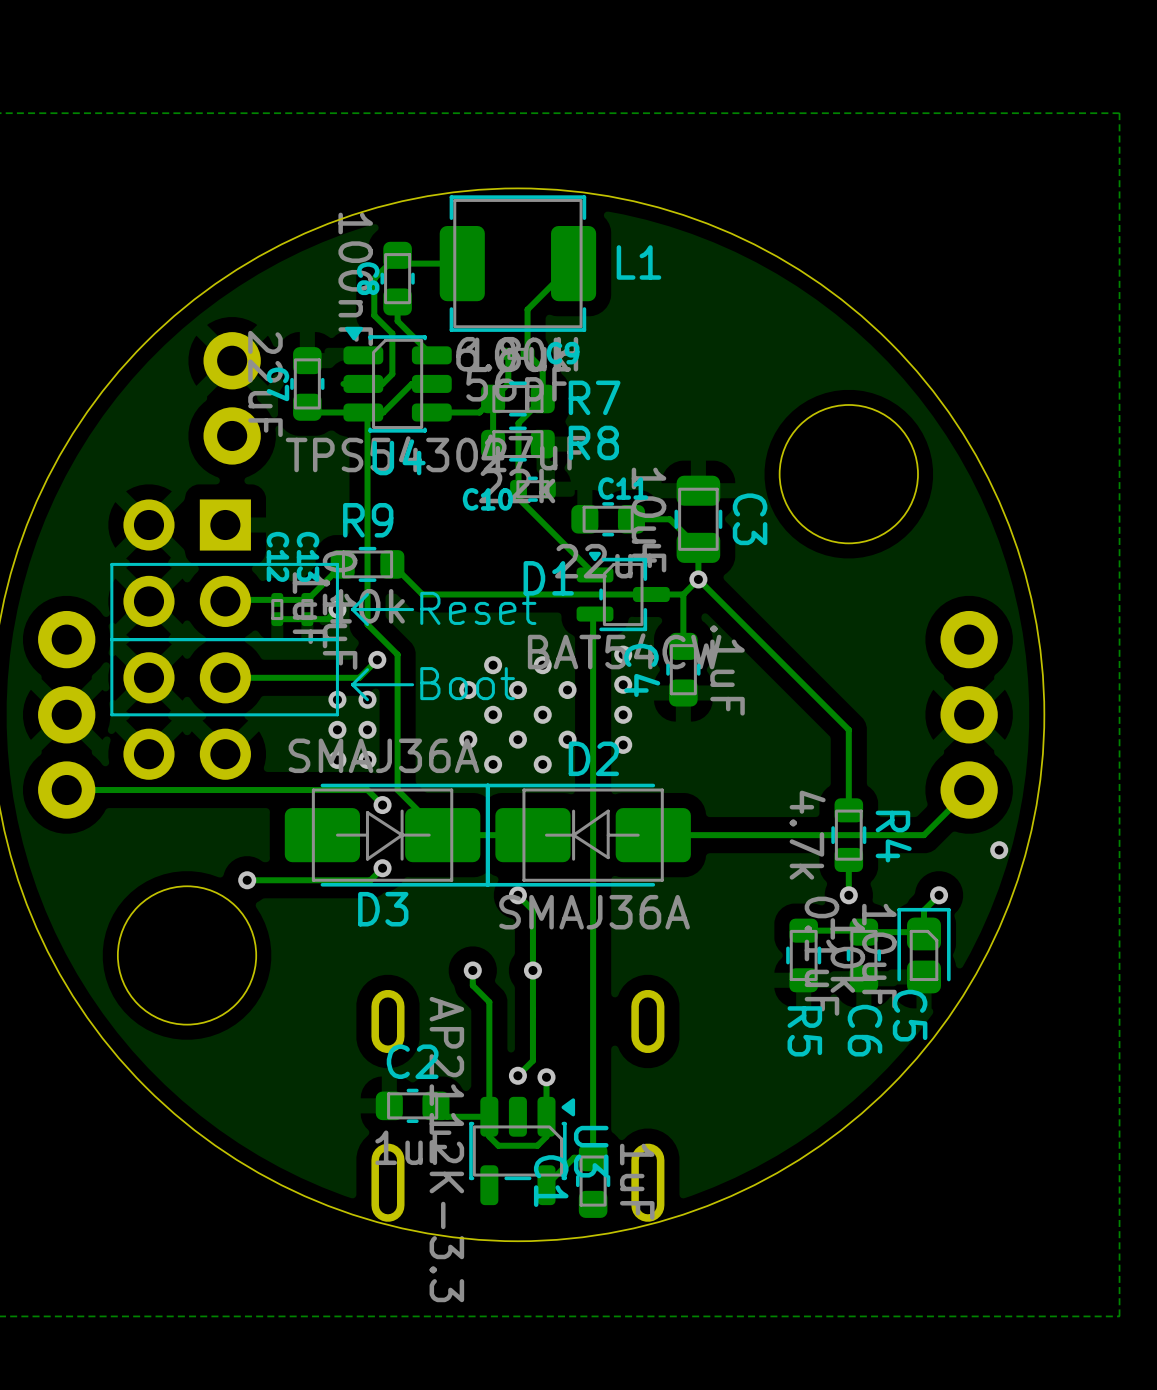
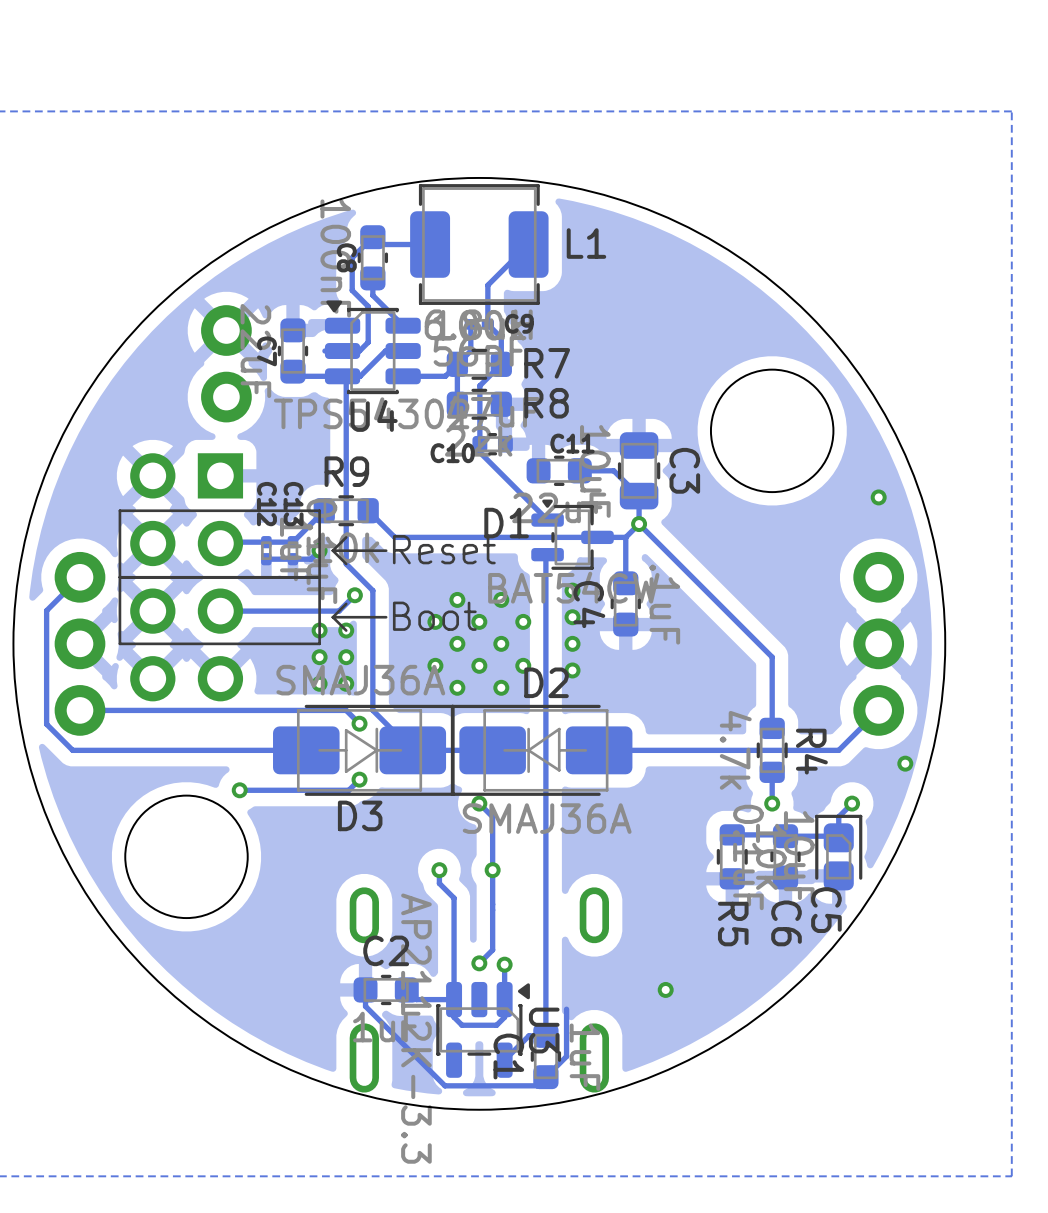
via: none -> (878, 497)
track: none -> (80, 577) (46, 610) (46, 724) (72, 750) (306, 750)
track: none -> (365, 989) (365, 1006) (444, 1085) (537, 1085) (566, 1056) (566, 1009)
via: none -> (665, 989)

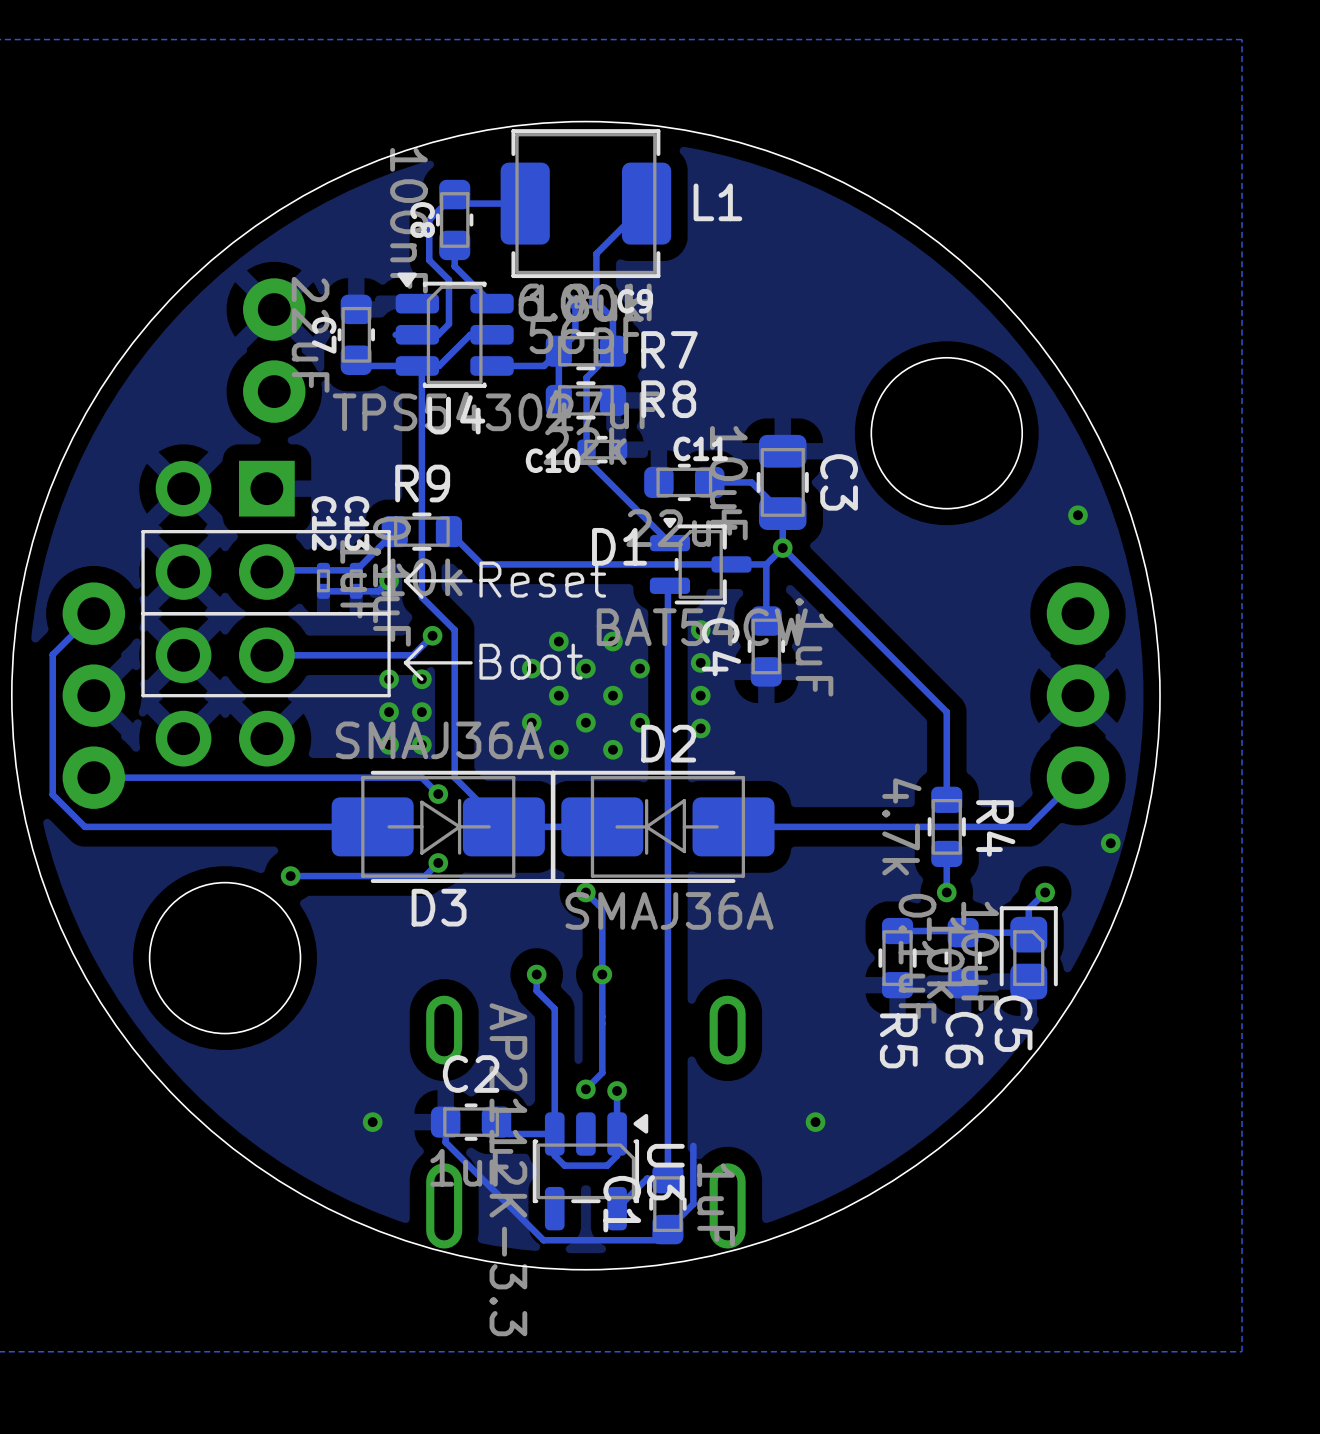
via: none -> (372, 1122)

